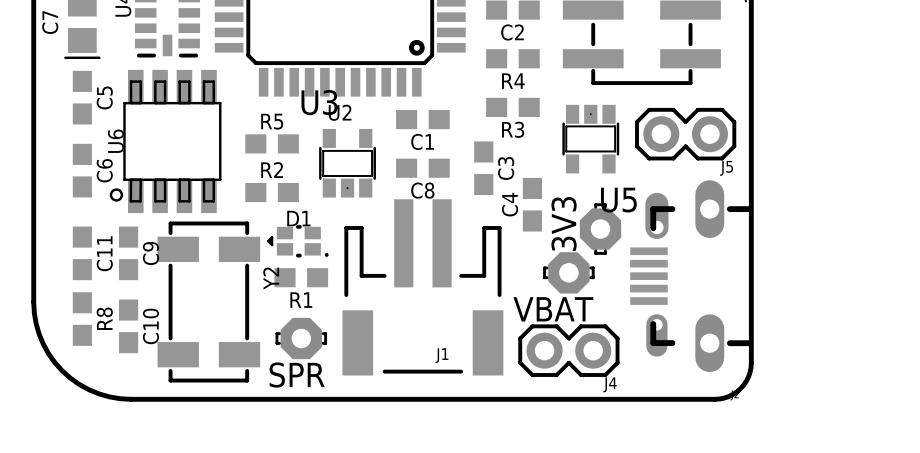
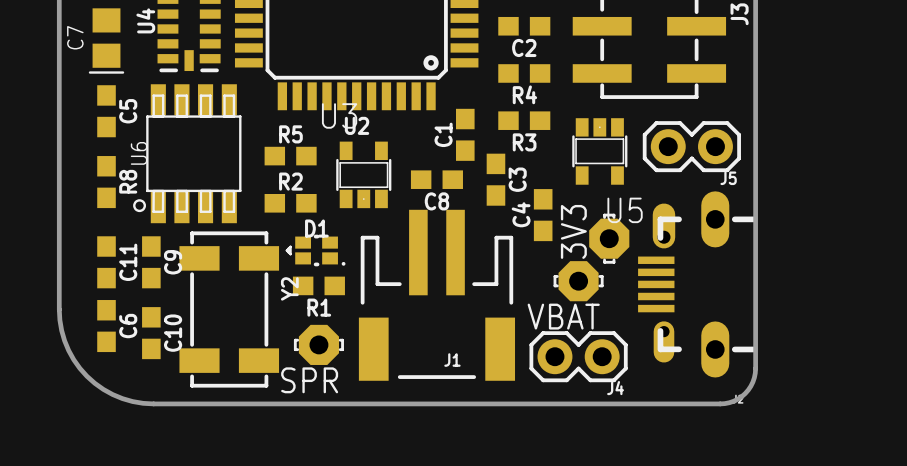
C1 rotation: 0° (422, 119) -> 90° clockwise (465, 134)
C6 name: C6 (104, 170) -> R8 (128, 181)
R8 name: R8 (104, 318) -> C6 (128, 326)

